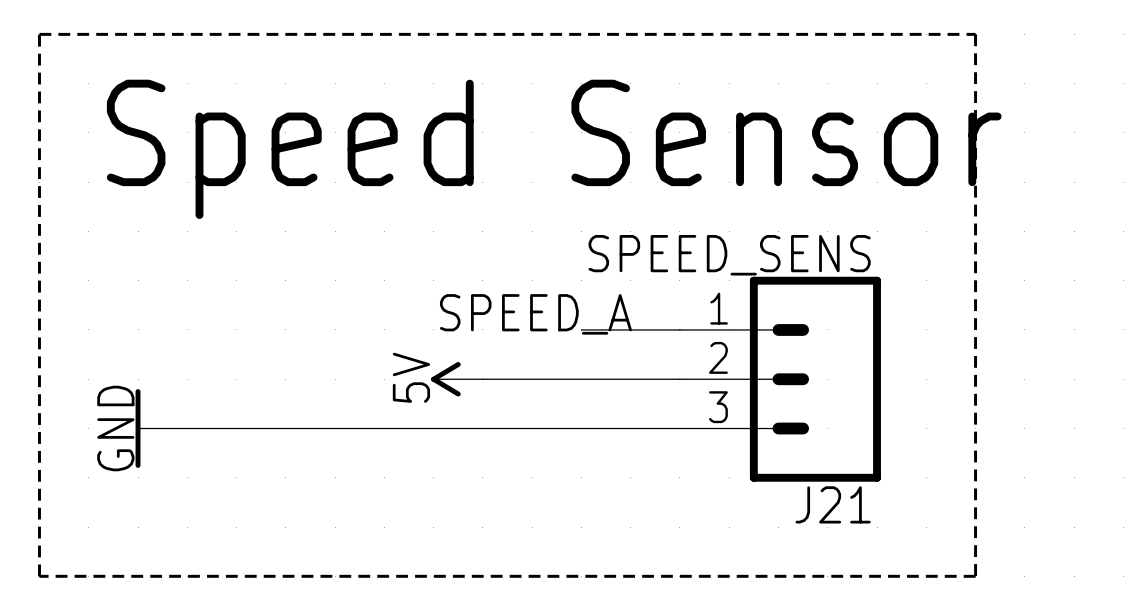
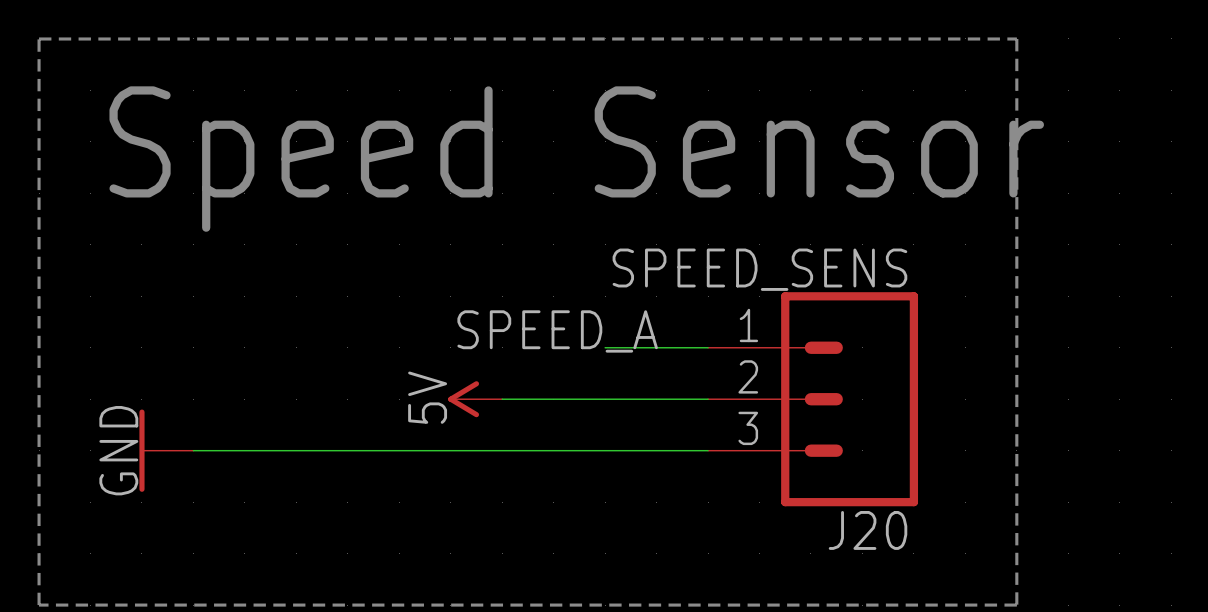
J21 name: J21 (833, 504) -> J20 (868, 530)

